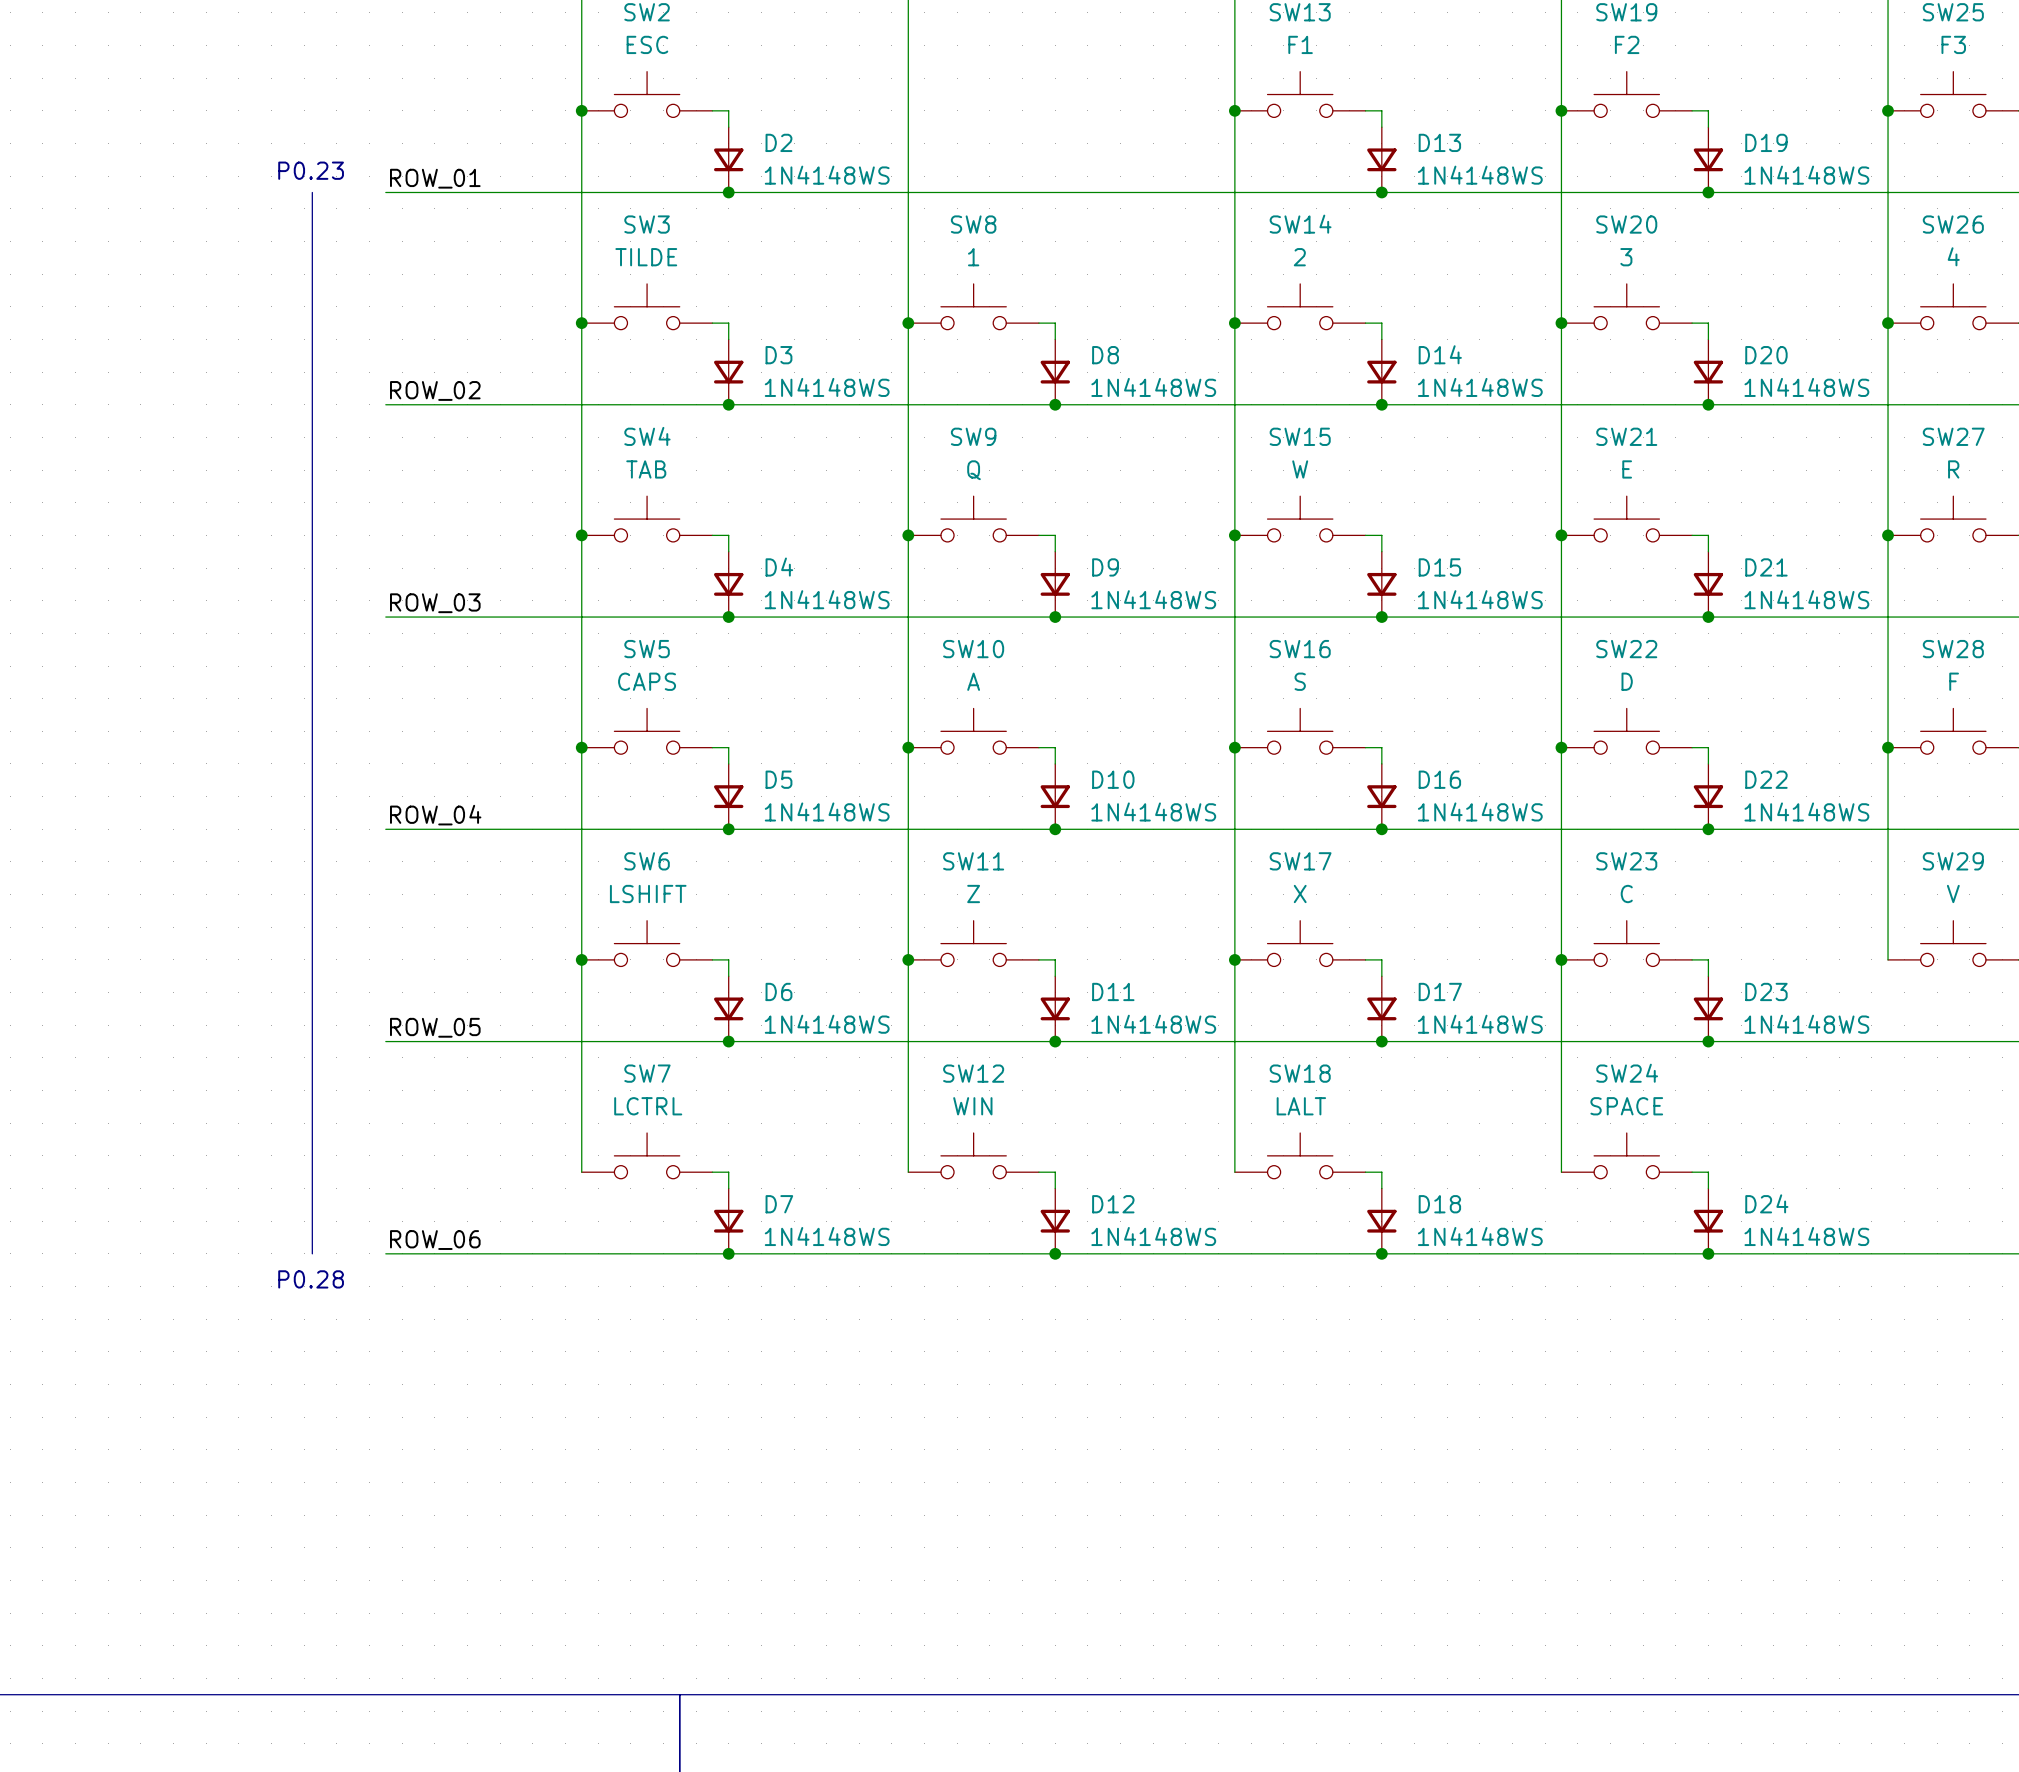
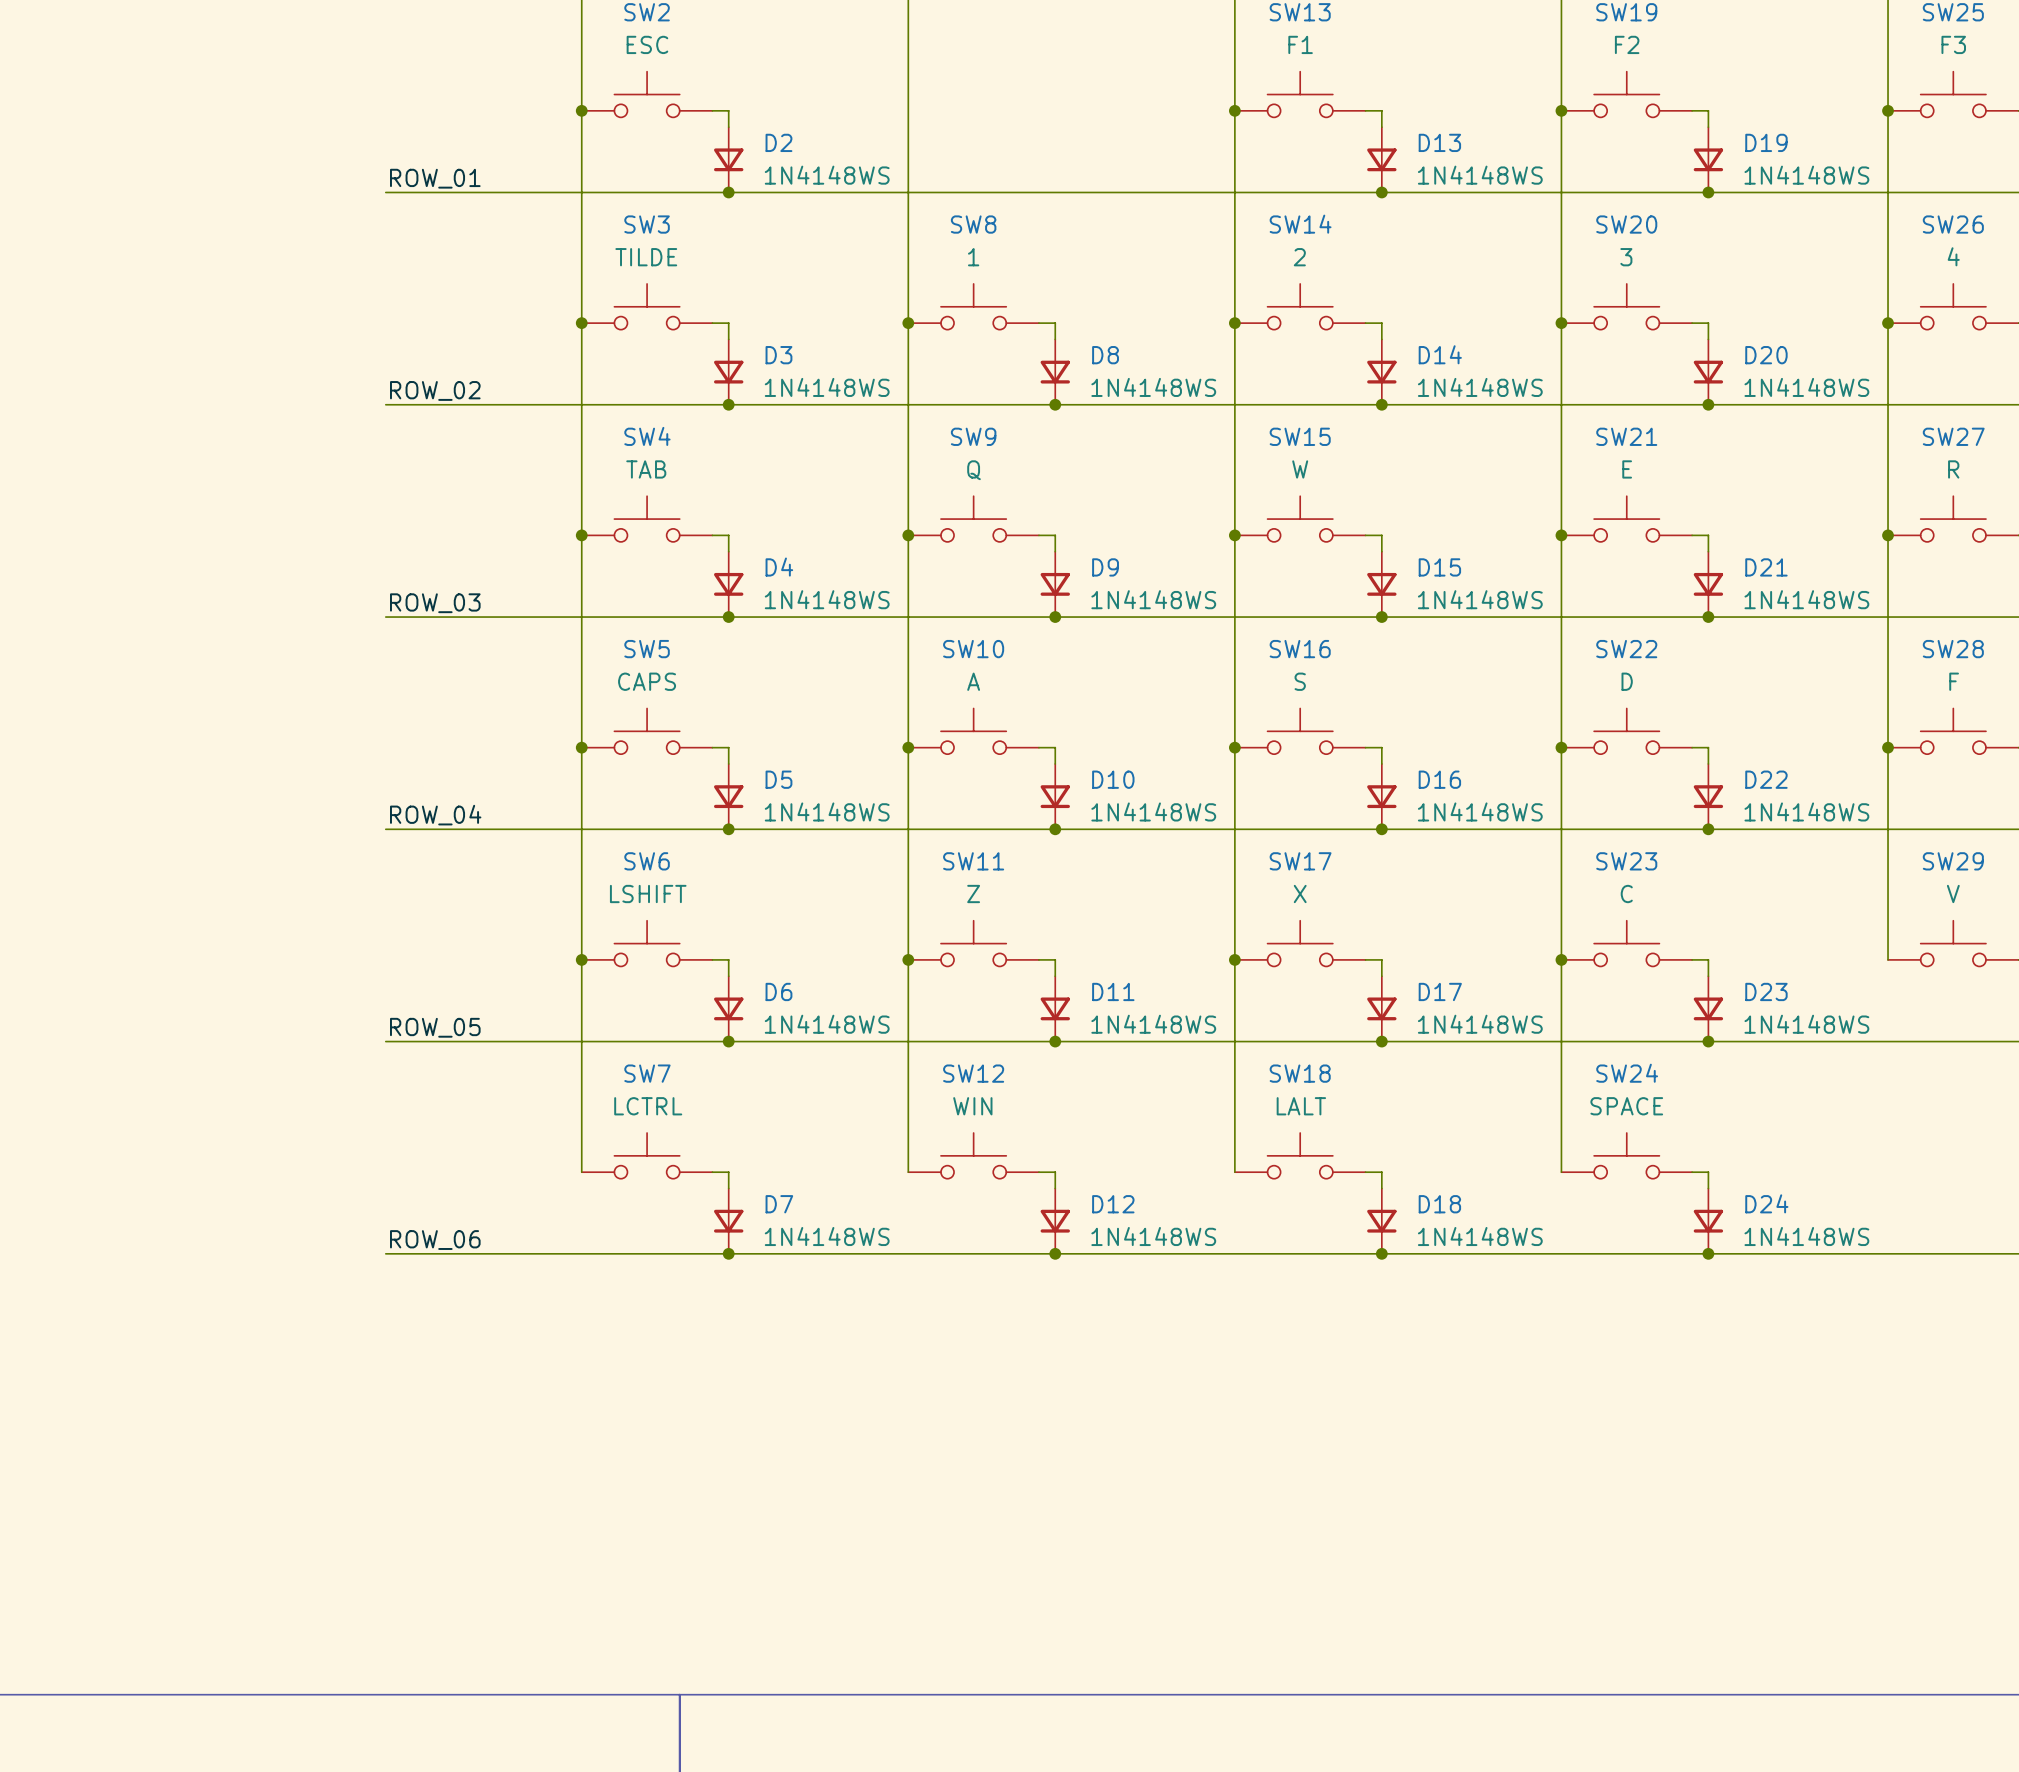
text: P0.23 (311, 170) -> none
line: (312, 192) (312, 1253) -> none
text: P0.28 (311, 1279) -> none

